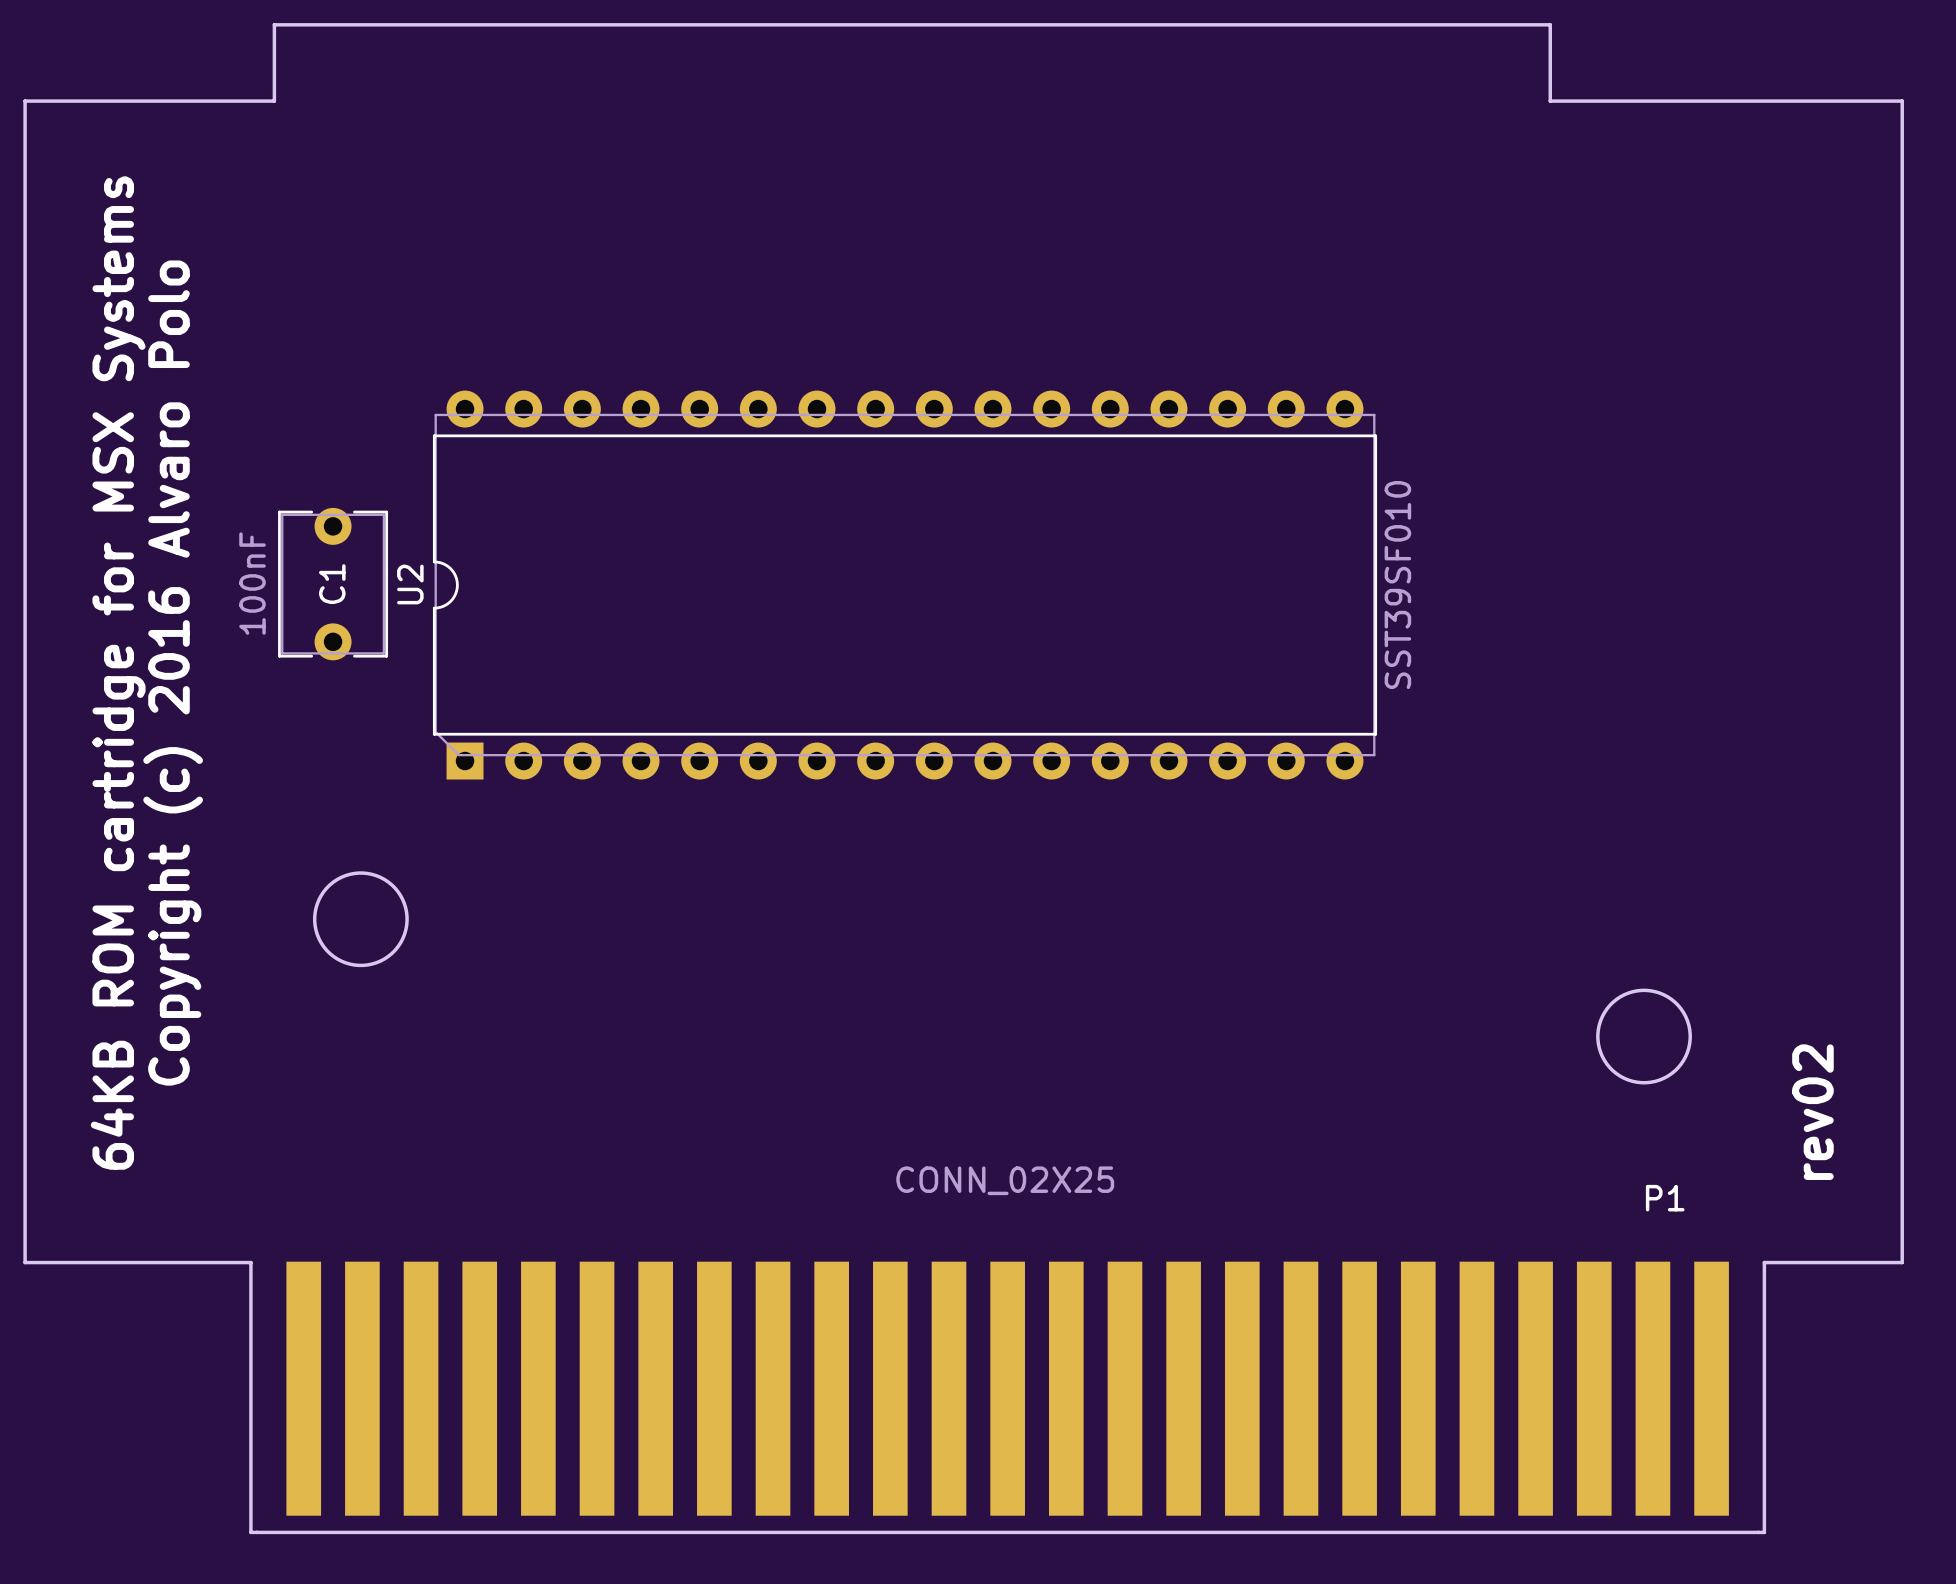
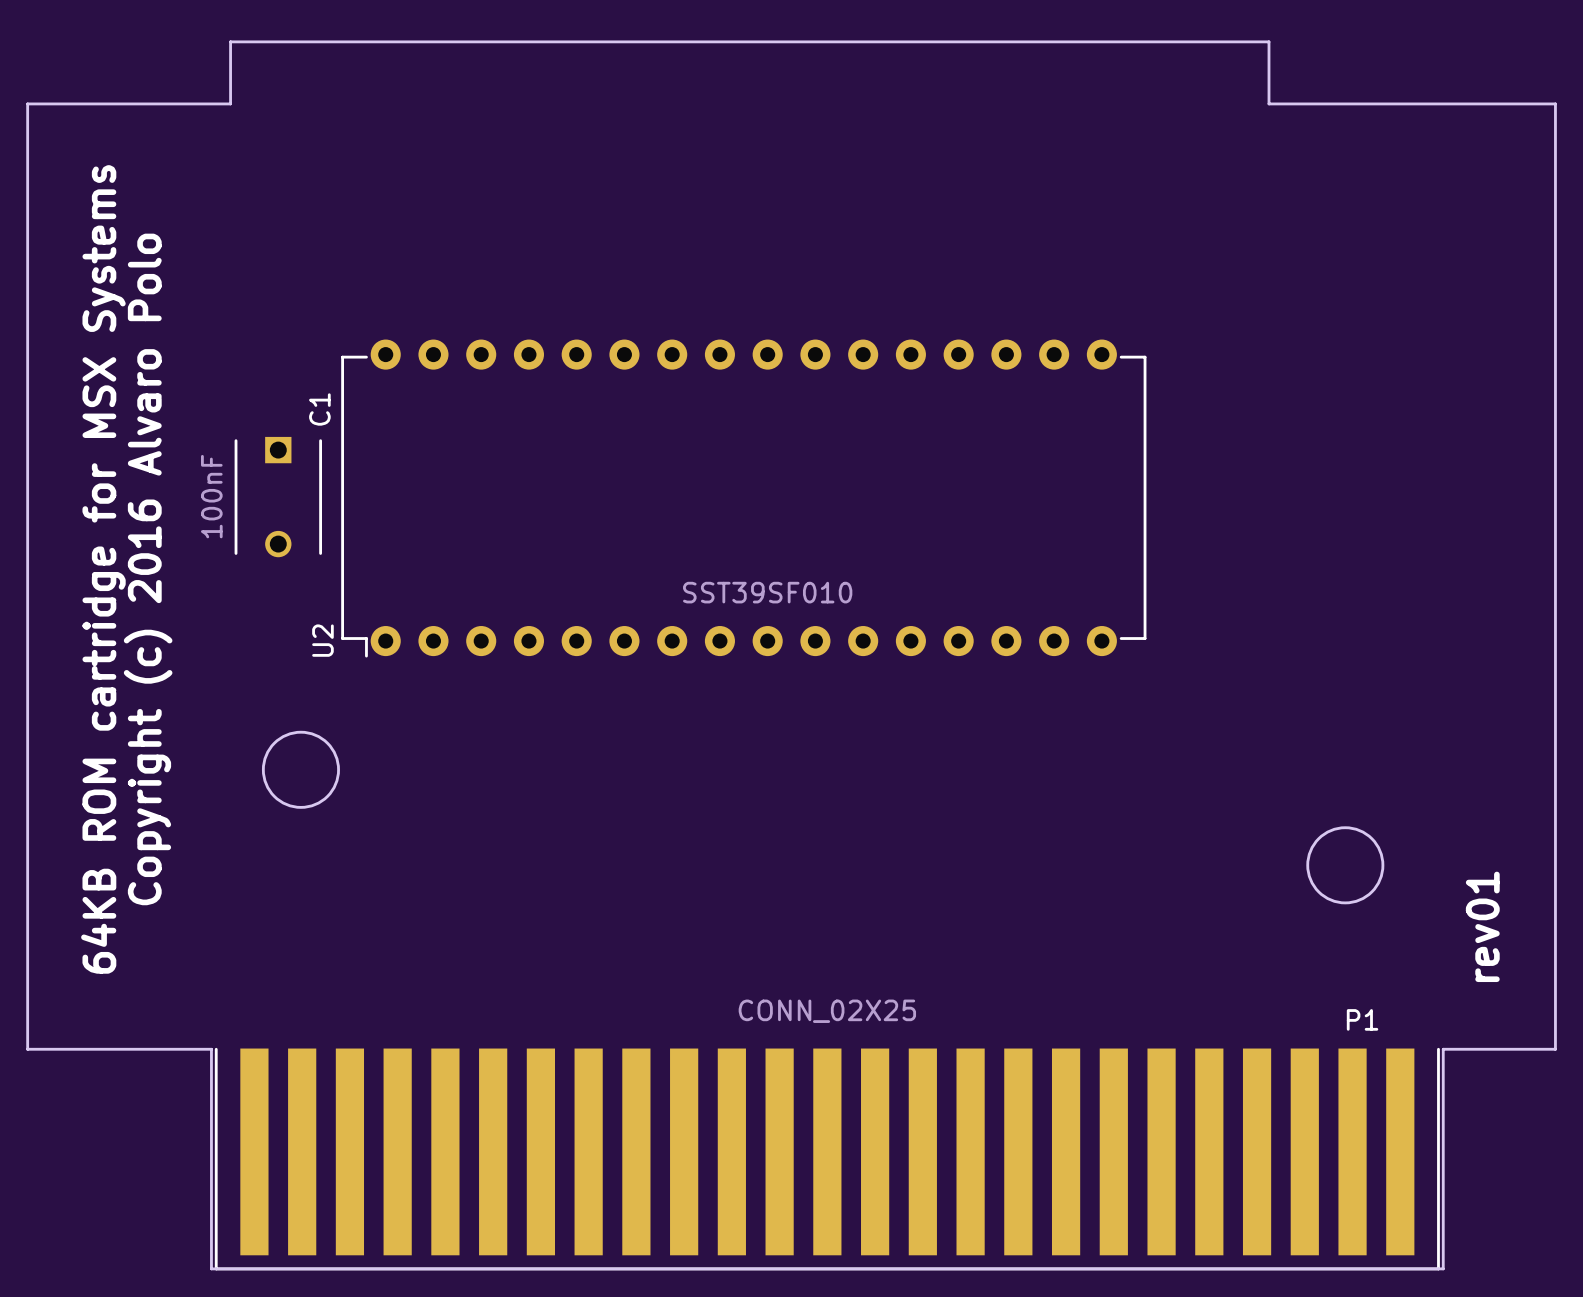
U2 footprint: [432, 390, 1378, 780] -> [341, 339, 1147, 658]
C1 footprint: [278, 507, 389, 661] -> [234, 436, 323, 558]
C1 name position: C1 (332, 584) -> C1 (319, 409)
U2 name position: U2 (410, 584) -> U2 (322, 640)
U2 value position: SST39SF010 (1397, 585) -> SST39SF010 (767, 592)
text: rev02 (1812, 1112) -> rev01 (1482, 926)
P1 footprint: [286, 1261, 1729, 1516] -> [214, 1047, 1440, 1271]

